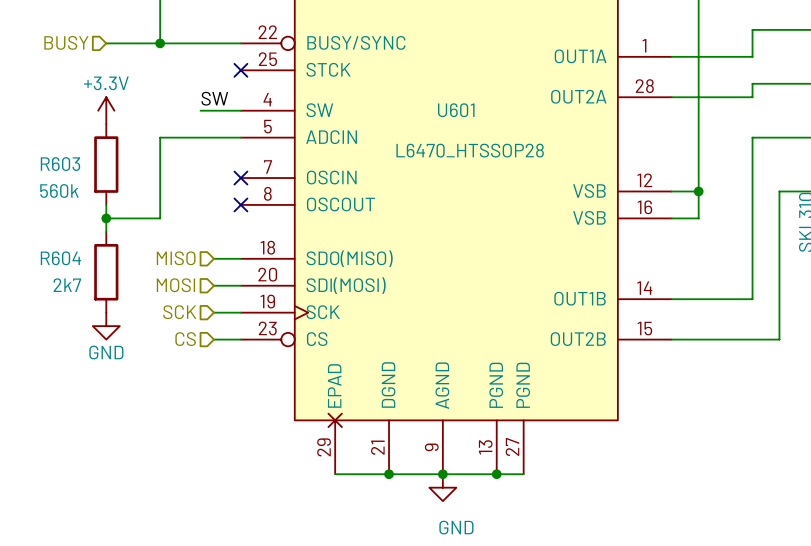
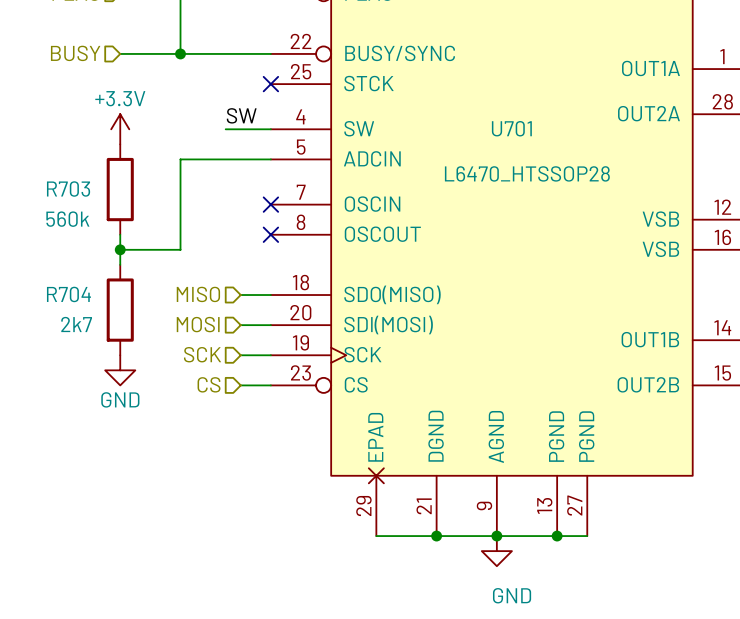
U601 name: U601 (456, 110) -> U701 (511, 128)
R603 name: R603 (60, 164) -> R703 (68, 189)
R604 name: R604 (60, 258) -> R704 (68, 294)

